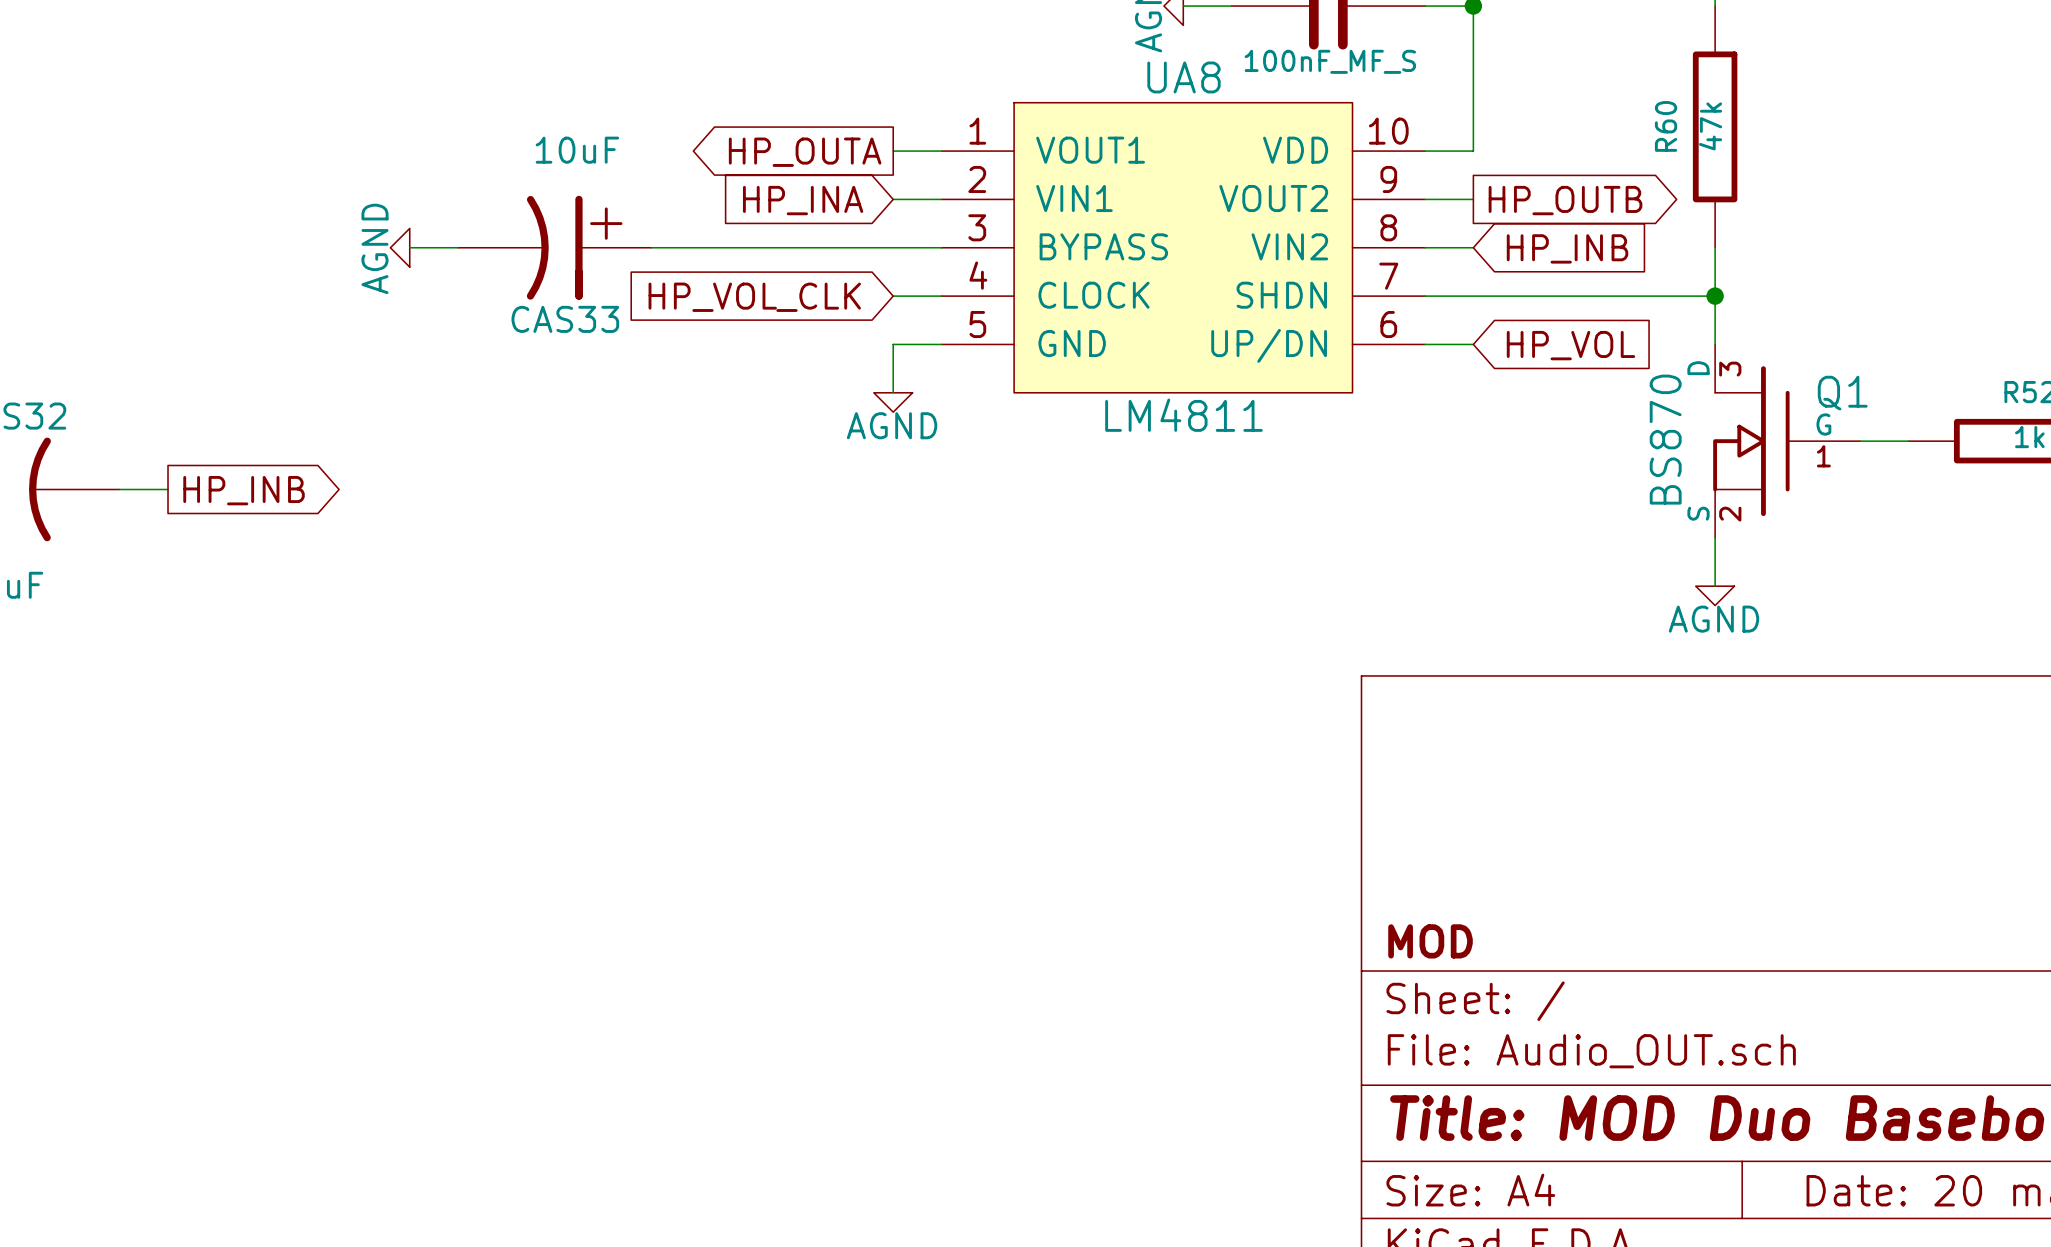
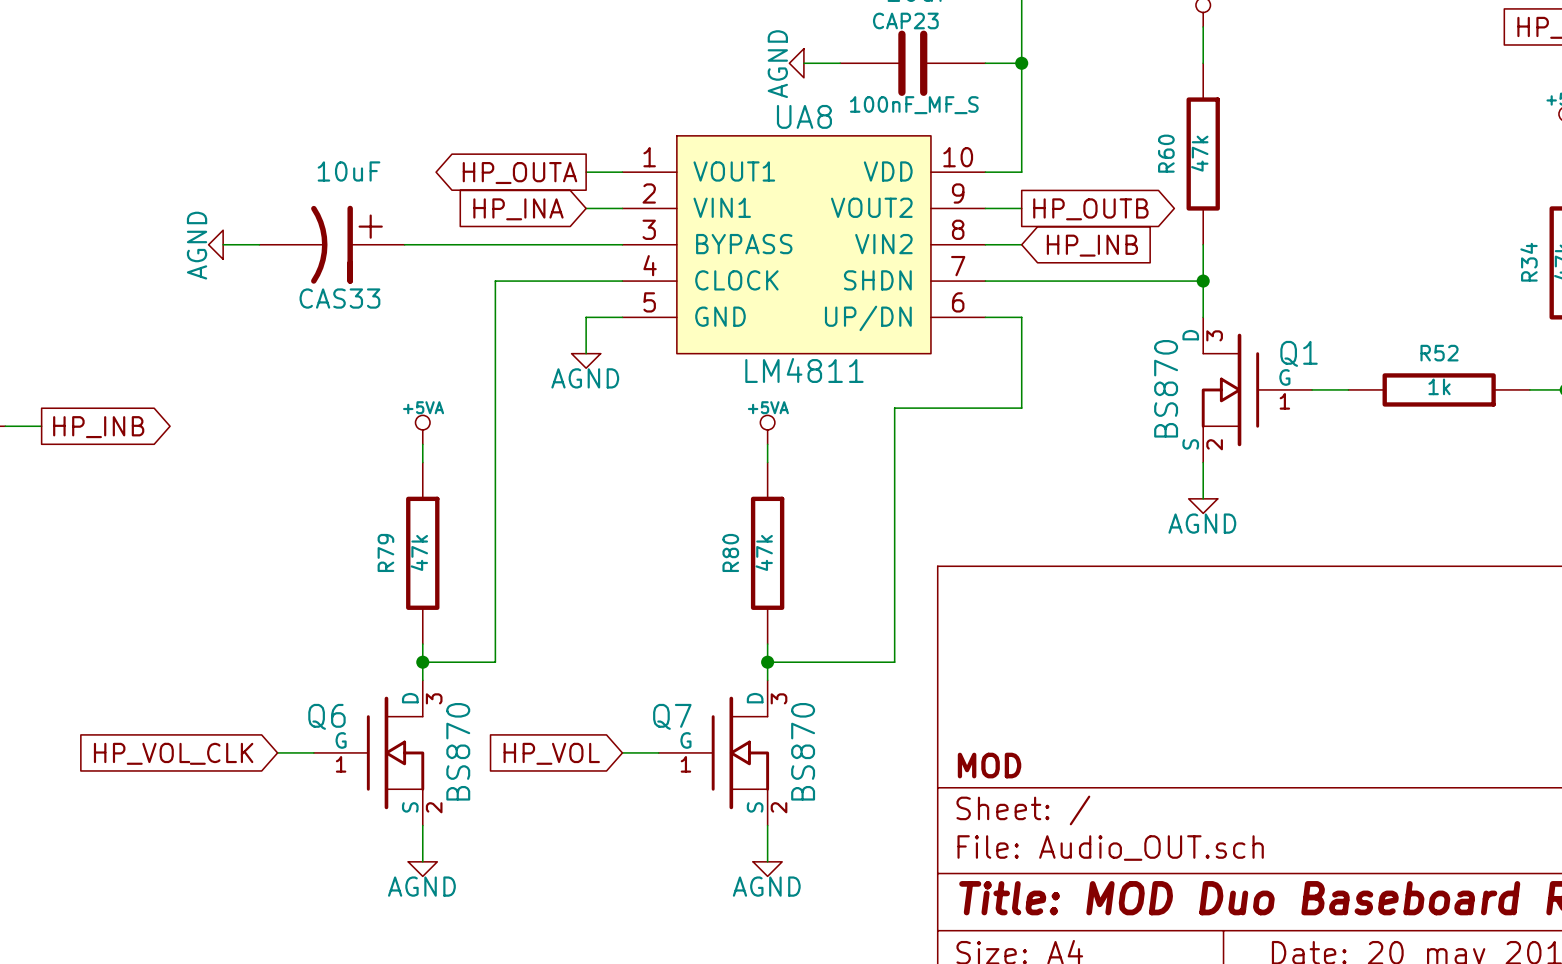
wire: none -> (586, 281) (495, 281) (495, 662) (422, 662)
global label: HP_VOL_CLK (754, 297) -> none
wire: none -> (1021, 317) (1021, 408) (894, 408) (894, 662) (767, 662)
global label: HP_VOL (1570, 345) -> none
power symbol: none -> +5VA (422, 429)
power symbol: none -> +5VA (767, 429)
wire: none -> (422, 444) (422, 462)
wire: none -> (767, 444) (767, 462)
R79: none -> 47k (422, 553)
R80: none -> 47k (767, 553)
wire: none -> (422, 644) (422, 680)
wire: none -> (767, 644) (767, 680)
junction: none -> (422, 662)
junction: none -> (767, 662)
wire: none -> (277, 752) (313, 752)
Q6: none -> BS870 (369, 752)
wire: none -> (622, 752) (658, 752)
Q7: none -> BS870 (713, 752)
global label: none -> HP_VOL_CLK (173, 753)
global label: none -> HP_VOL (551, 753)
wire: none -> (422, 825) (422, 861)
wire: none -> (767, 825) (767, 861)
power symbol: none -> AGND (422, 869)
power symbol: none -> AGND (767, 869)

